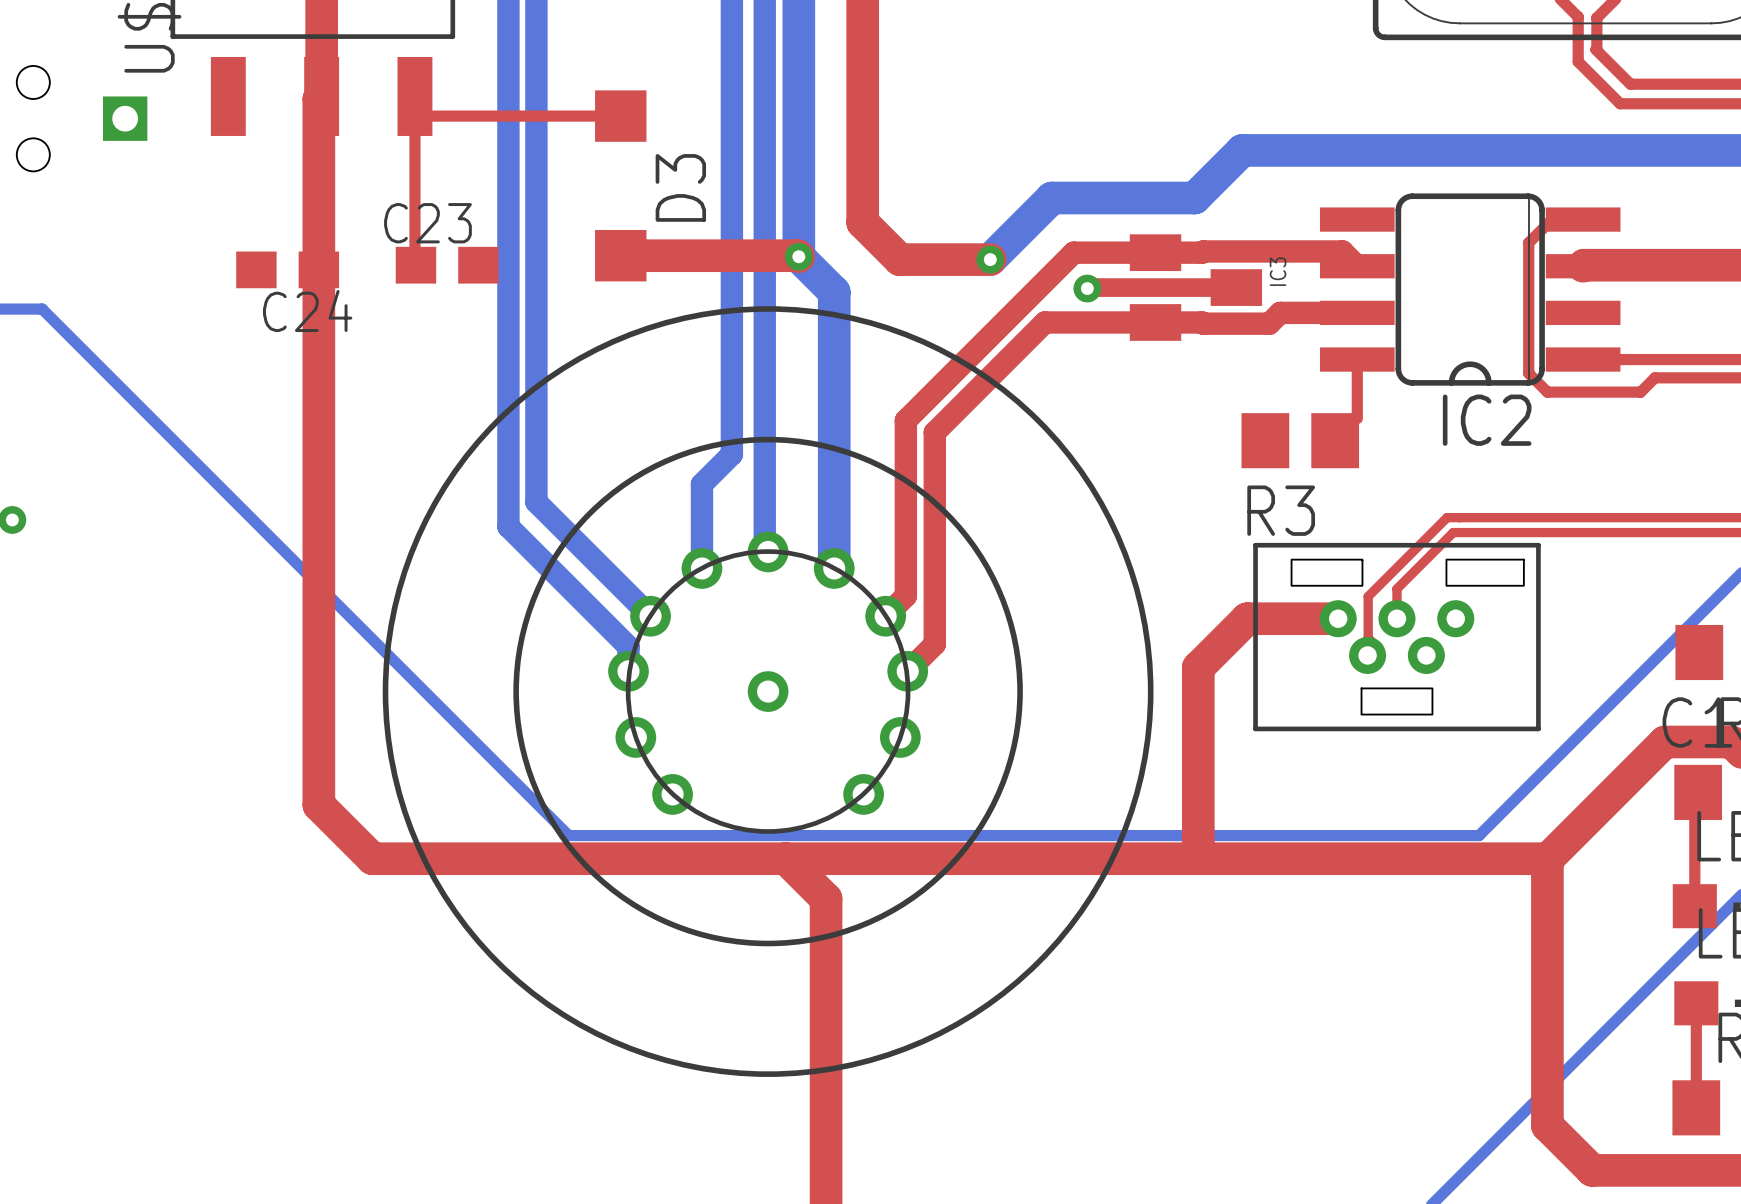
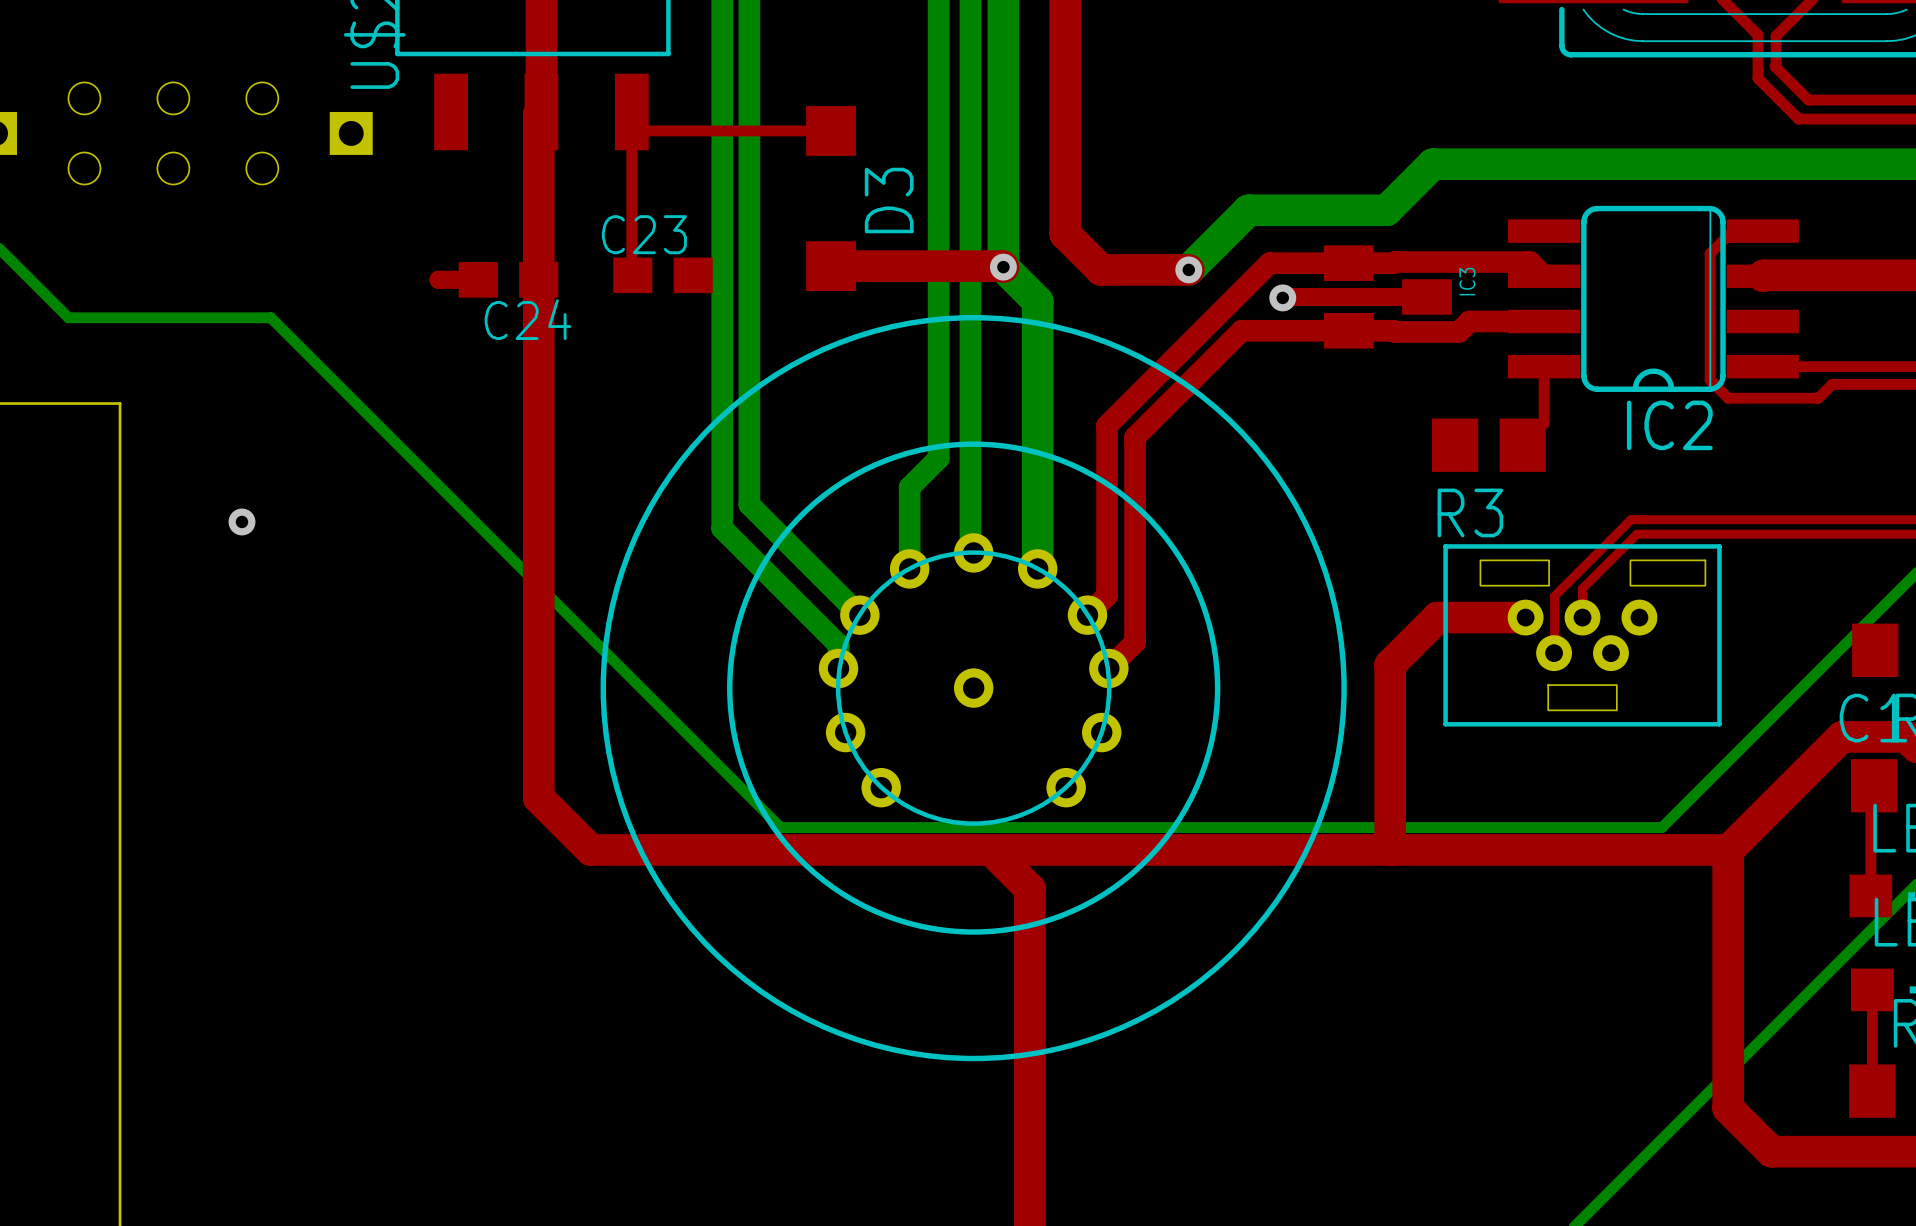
top track: none -> (438, 279) (478, 279)

